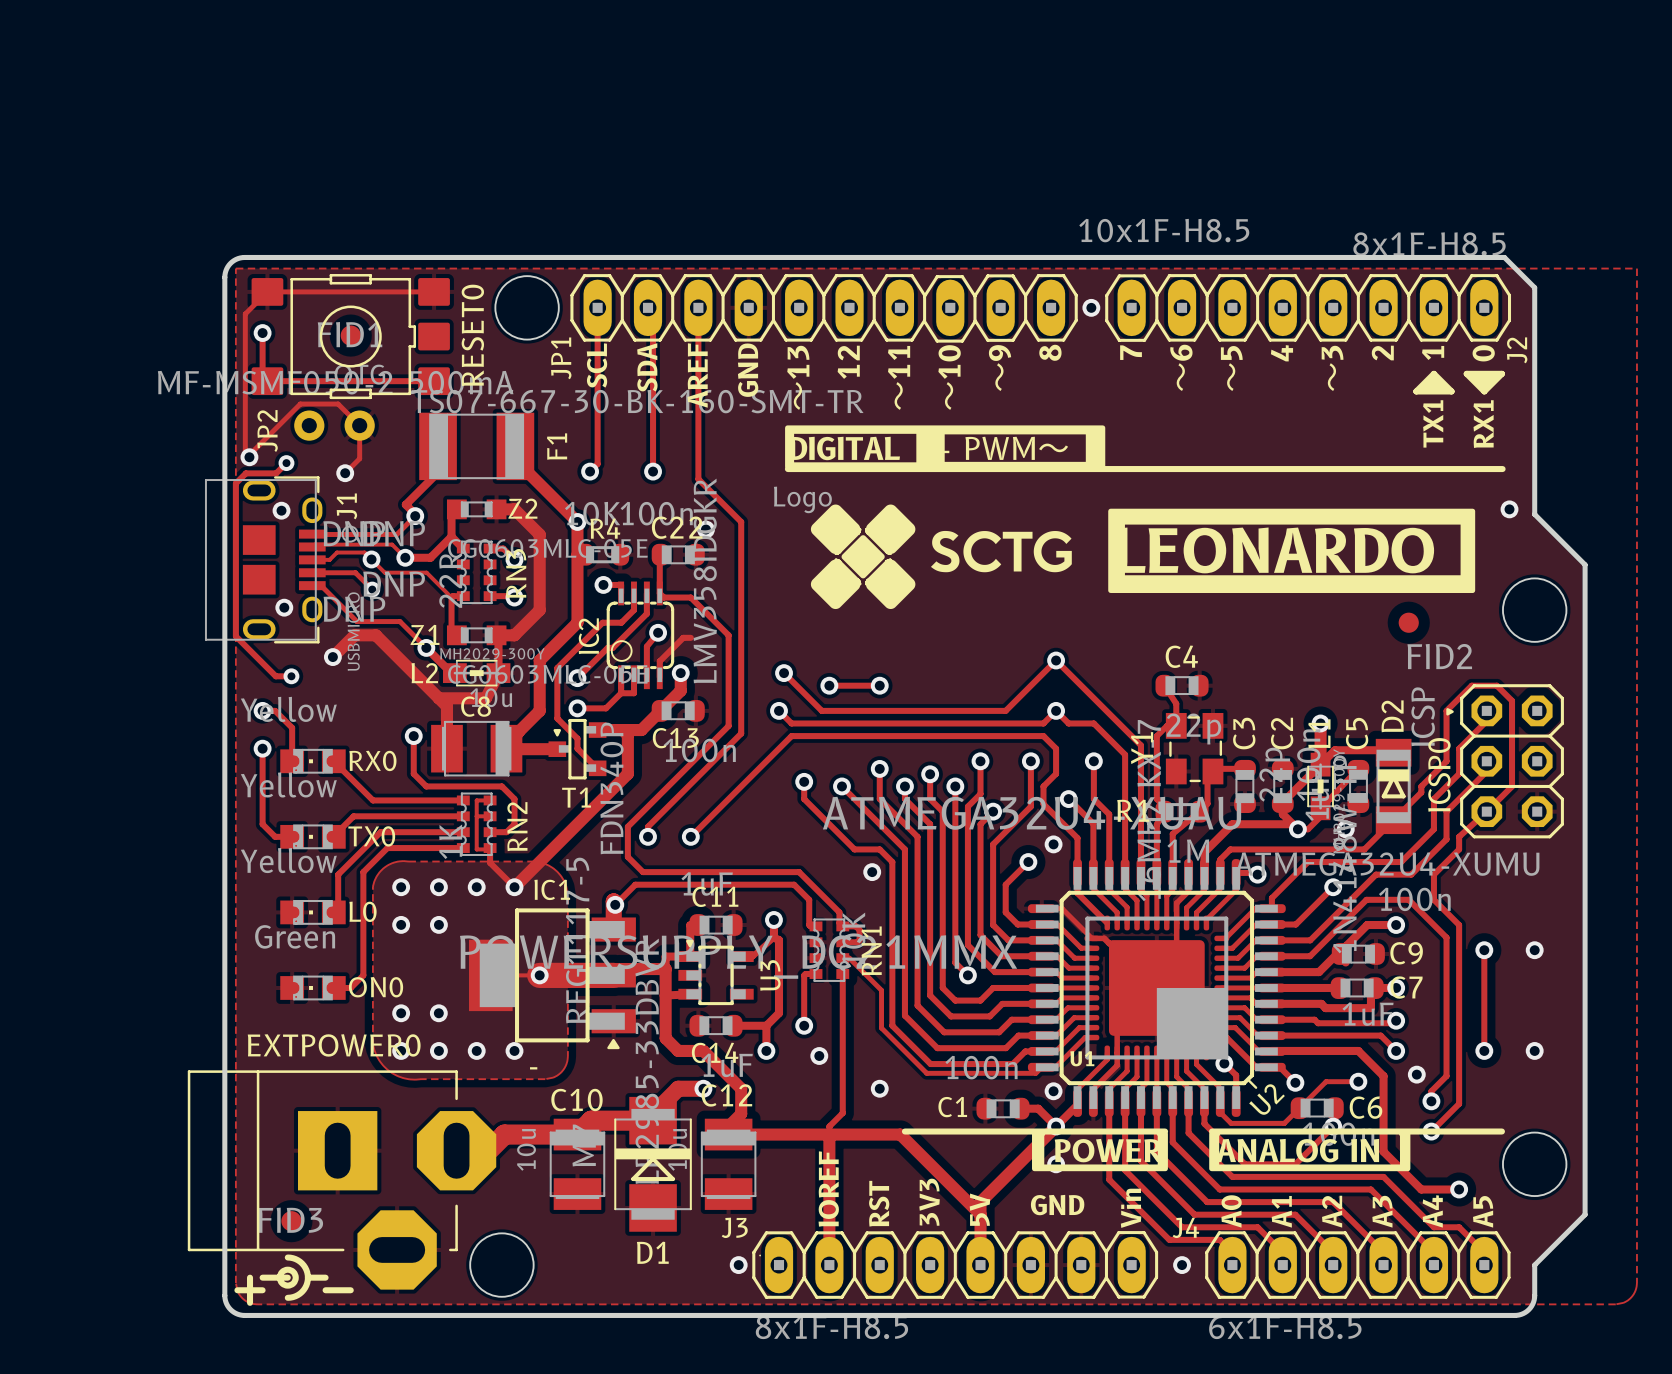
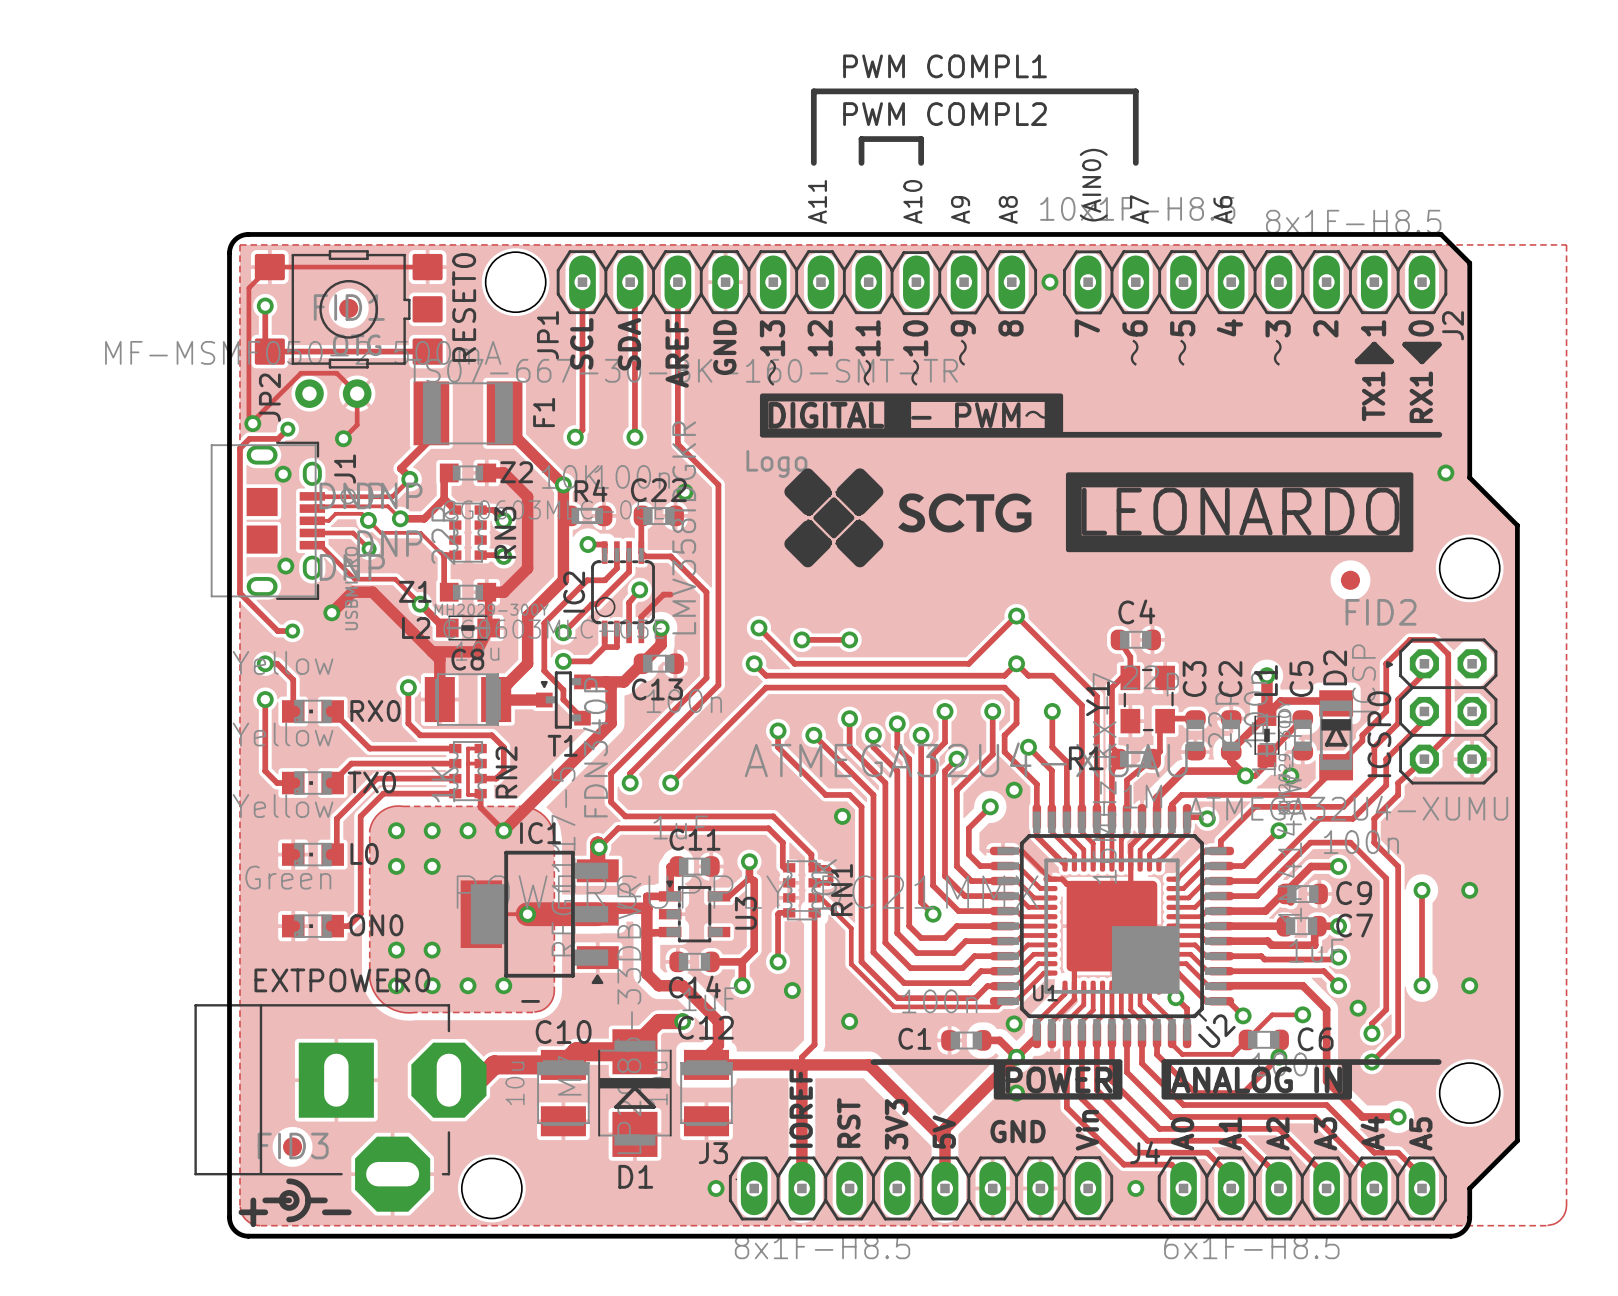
text: none -> PWM COMPL1 (945, 66)
text: none -> PWM COMPL2 (945, 114)
line: none -> (813, 162) (813, 91) (1135, 91) (1135, 162)
line: none -> (861, 162) (861, 139) (921, 139) (921, 162)
text: none -> (AIN0) (1093, 185)
text: none -> A11 (817, 201)
text: none -> A10 (912, 201)
text: none -> A9 (960, 209)
text: none -> A8 (1008, 209)
text: none -> A6 (1222, 209)
text: none -> A7 (1139, 209)

